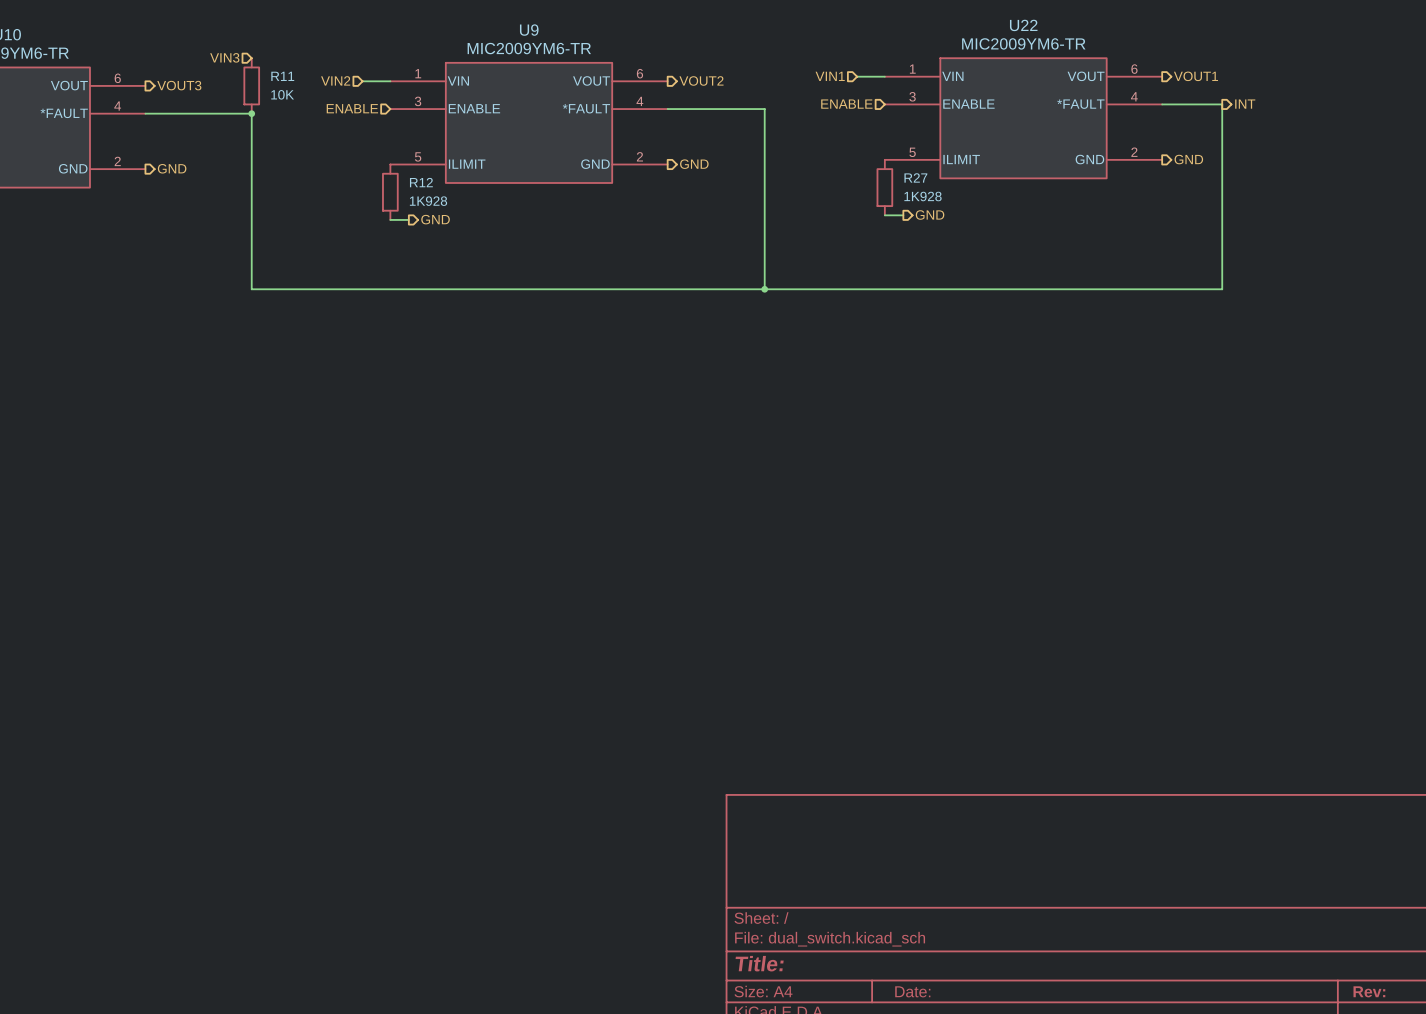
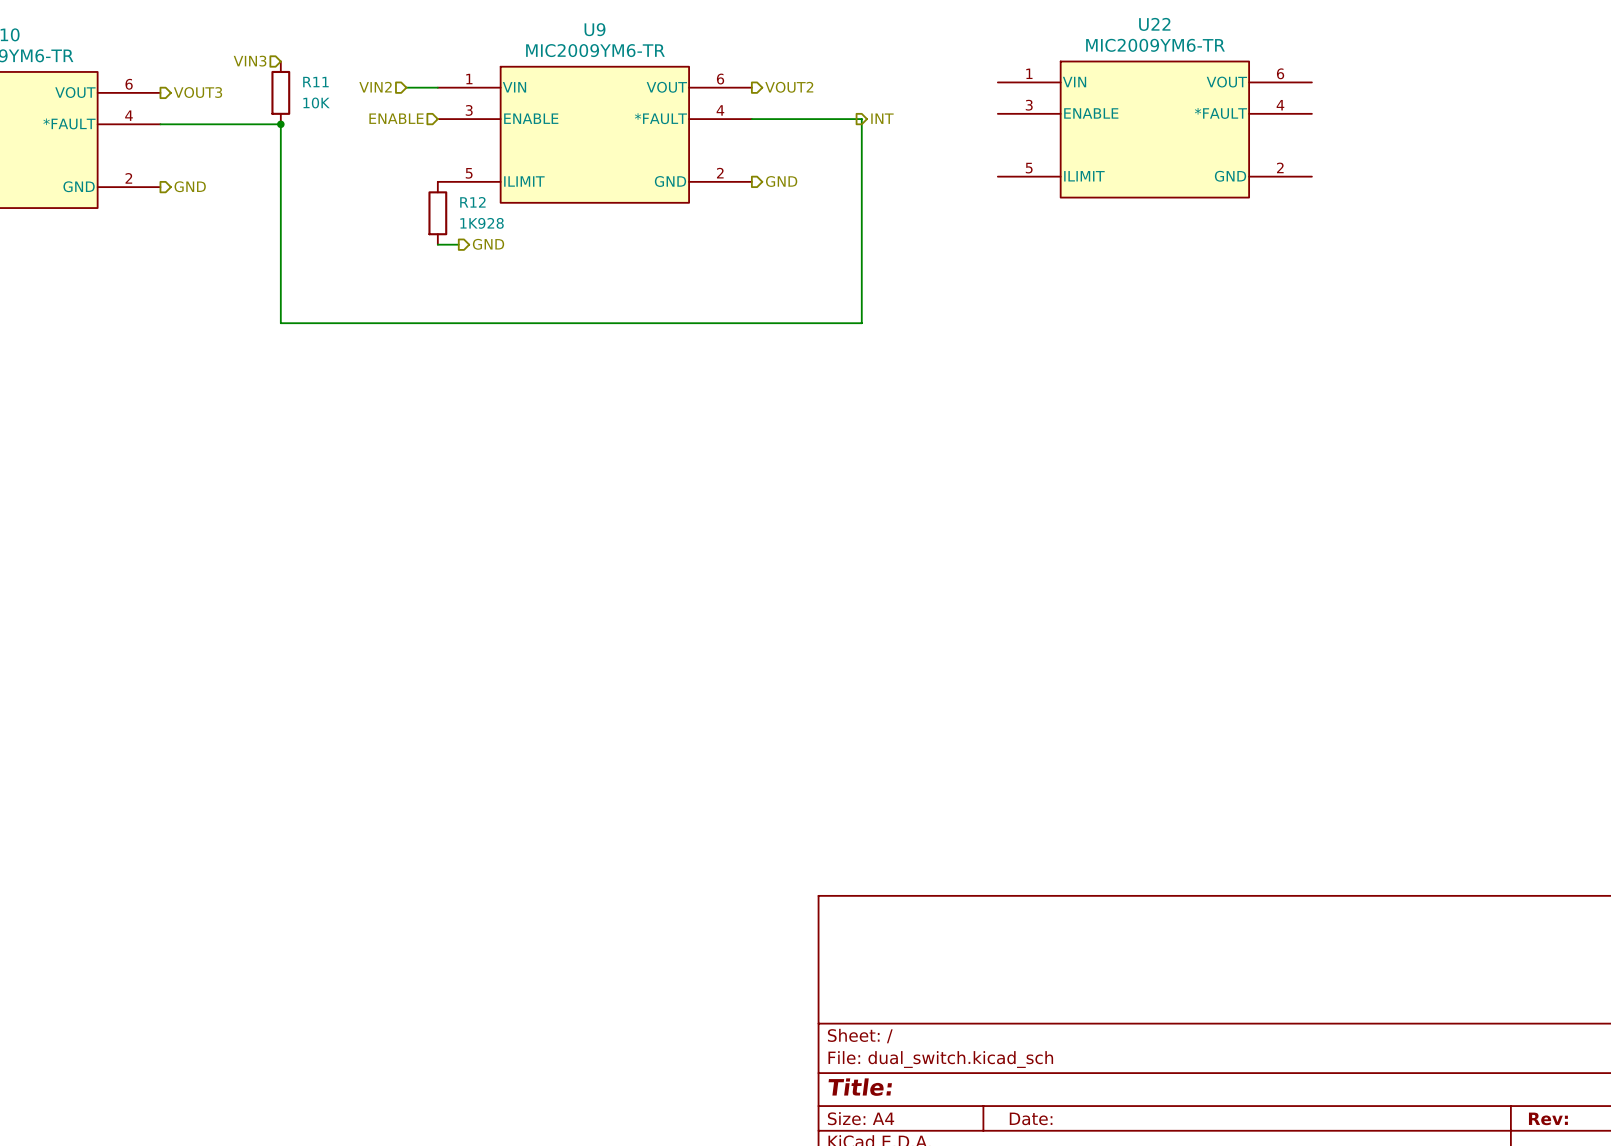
hierarchical label: VIN1 (830, 76) -> none
wire: (857, 76) (884, 76) -> none
hierarchical label: VOUT1 (1195, 76) -> none
hierarchical label: ENABLE (846, 104) -> none
wire: (1162, 104) (1222, 104) (1222, 289) (764, 289) -> none
hierarchical label: INT (1245, 104) -> none
hierarchical label: none -> INT (882, 118)
hierarchical label: GND (1188, 159) -> none
R27: 1K928 (884, 187) -> none
hierarchical label: GND (930, 214) -> none
wire: (884, 215) (903, 215) -> none
junction: (764, 289) -> none

